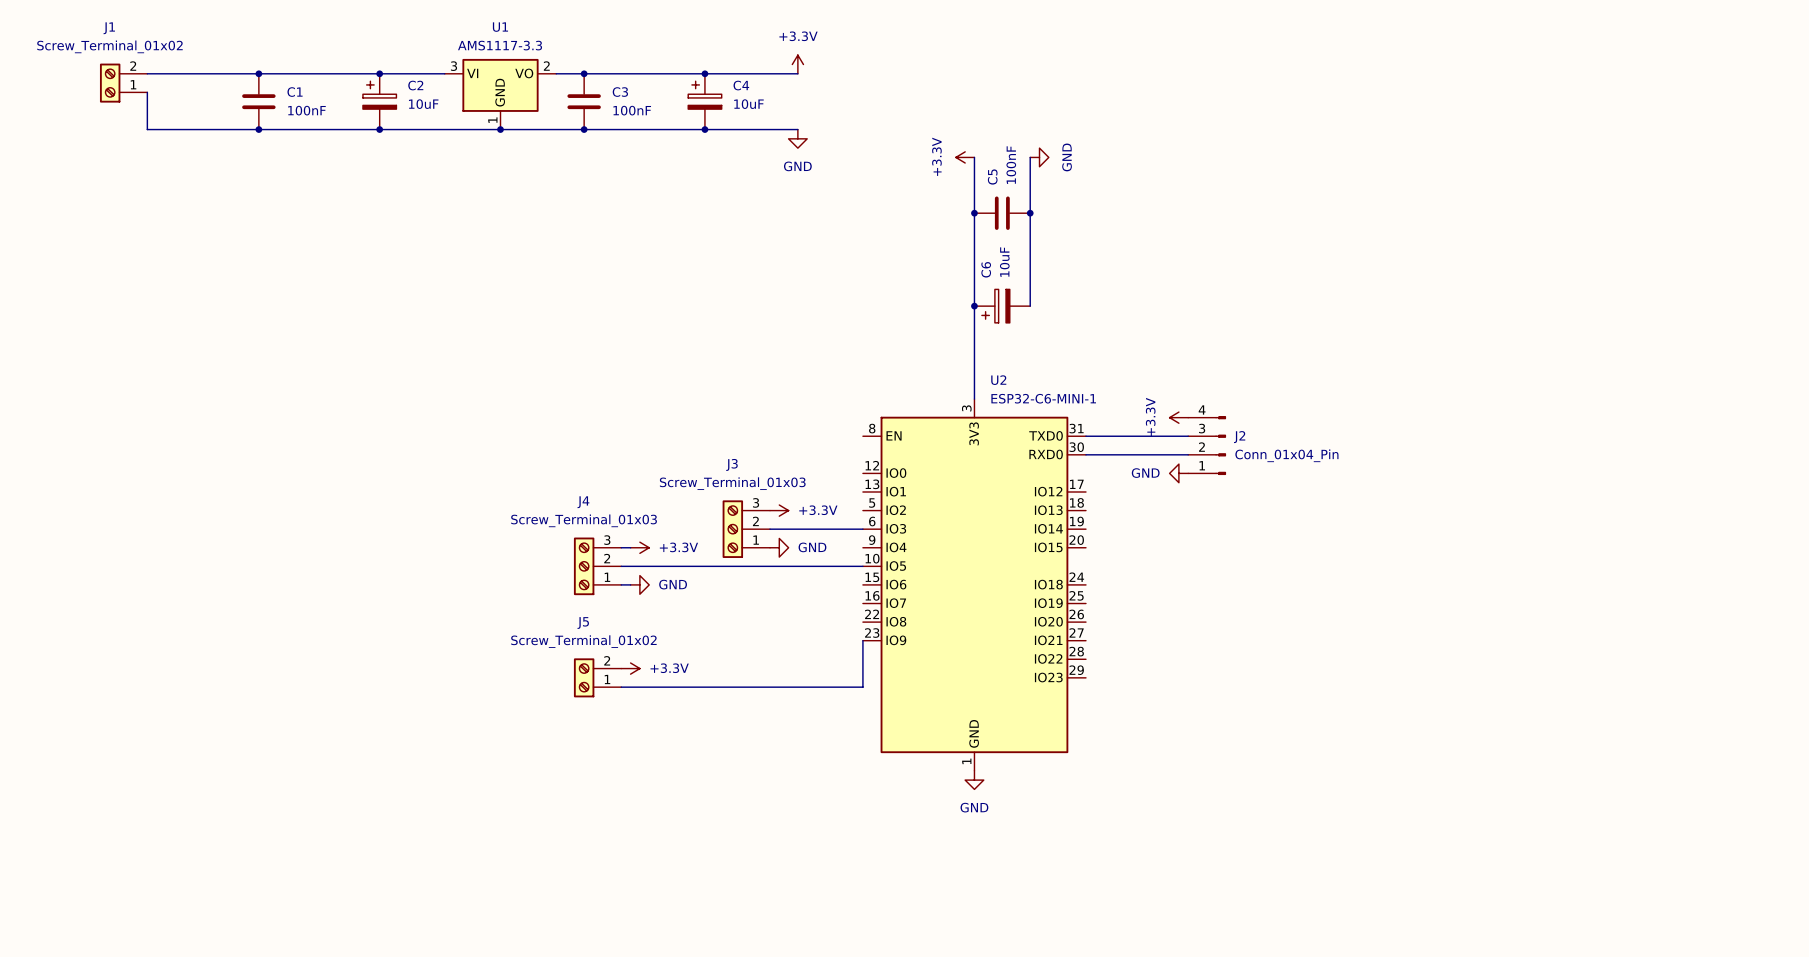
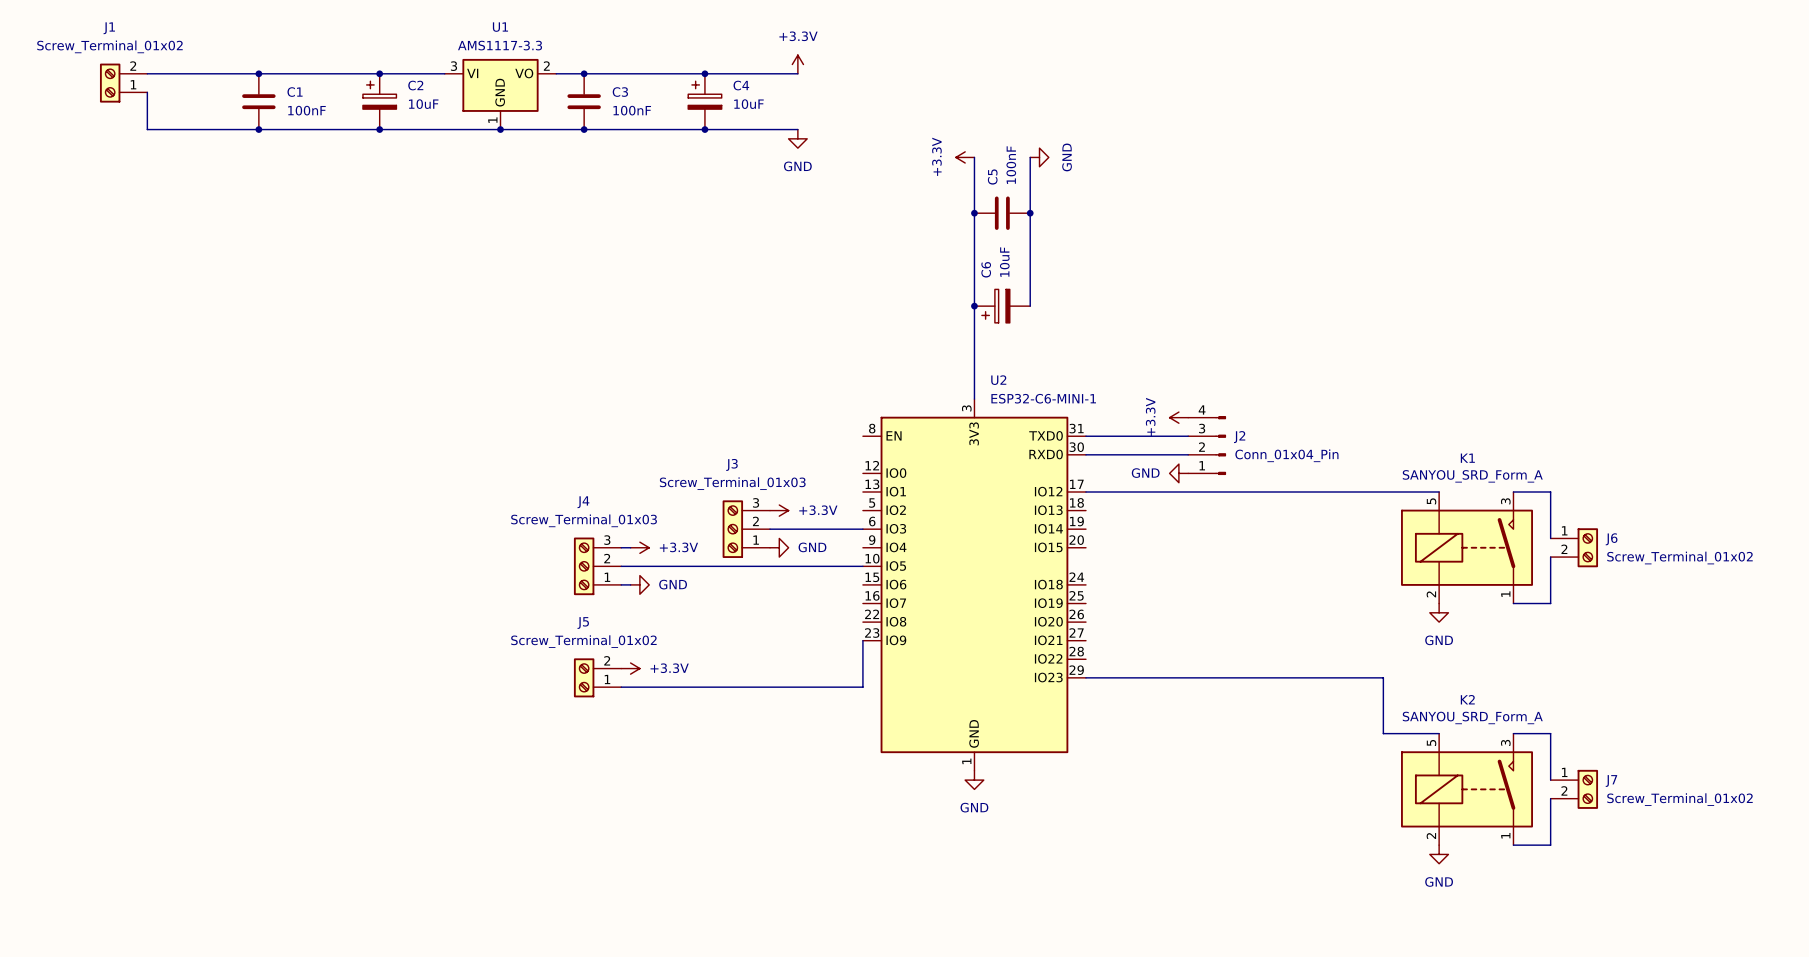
wire: none -> (1085, 491) (1439, 491)
wire: none -> (1513, 491) (1550, 491) (1550, 538)
K1: none -> SANYOU_SRD_Form_A (1467, 547)
J6: none -> Screw_Terminal_01x02 (1574, 547)
wire: none -> (1550, 557) (1550, 603) (1513, 603)
power symbol: none -> GND (1439, 612)
wire: none -> (1085, 677) (1383, 677) (1383, 733) (1439, 733)
wire: none -> (1513, 733) (1550, 733) (1550, 780)
K2: none -> SANYOU_SRD_Form_A (1467, 789)
J7: none -> Screw_Terminal_01x02 (1574, 789)
wire: none -> (1550, 798) (1550, 845) (1513, 845)
power symbol: none -> GND (1439, 854)

